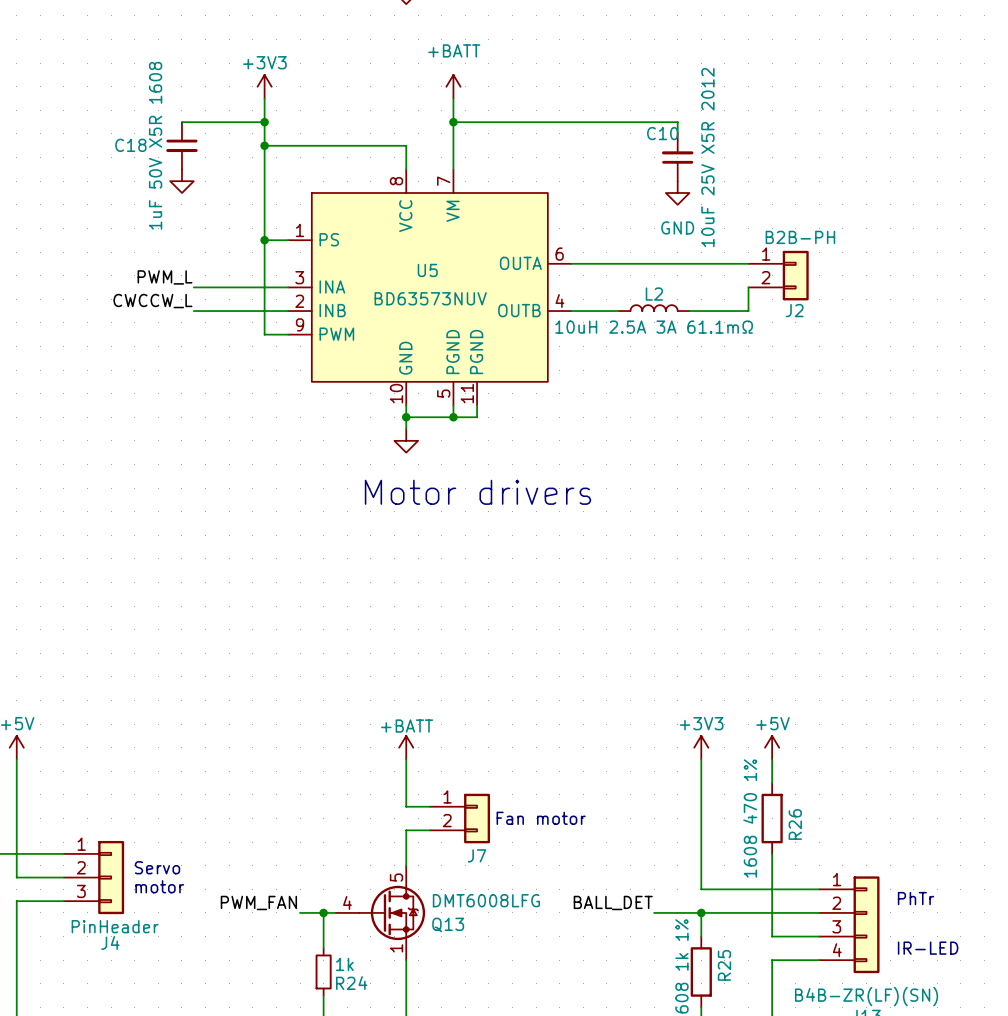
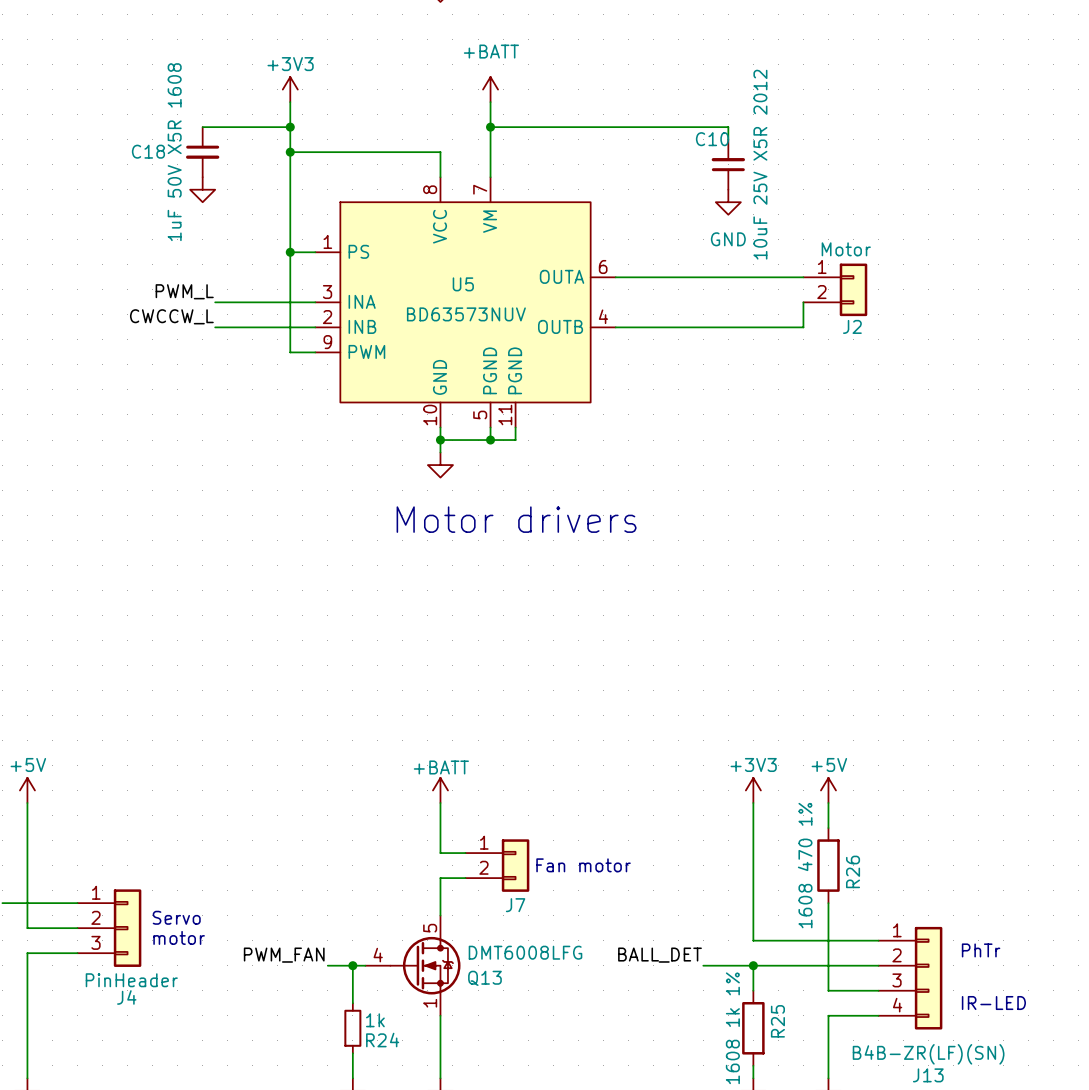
J2 value: B2B-PH (800, 237) -> Motor (846, 249)
L2: (654, 308) -> none
wire: none -> (665, 327) (740, 327)

